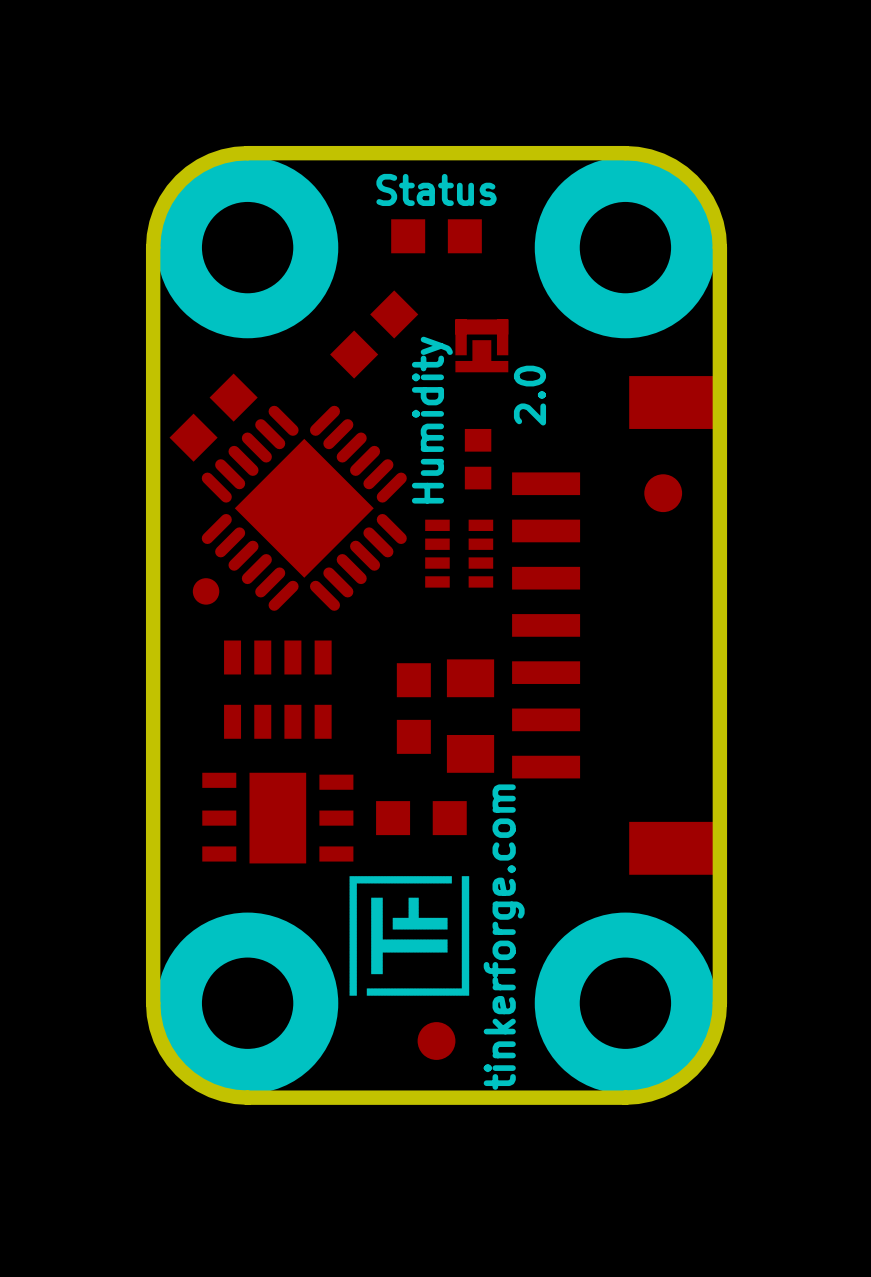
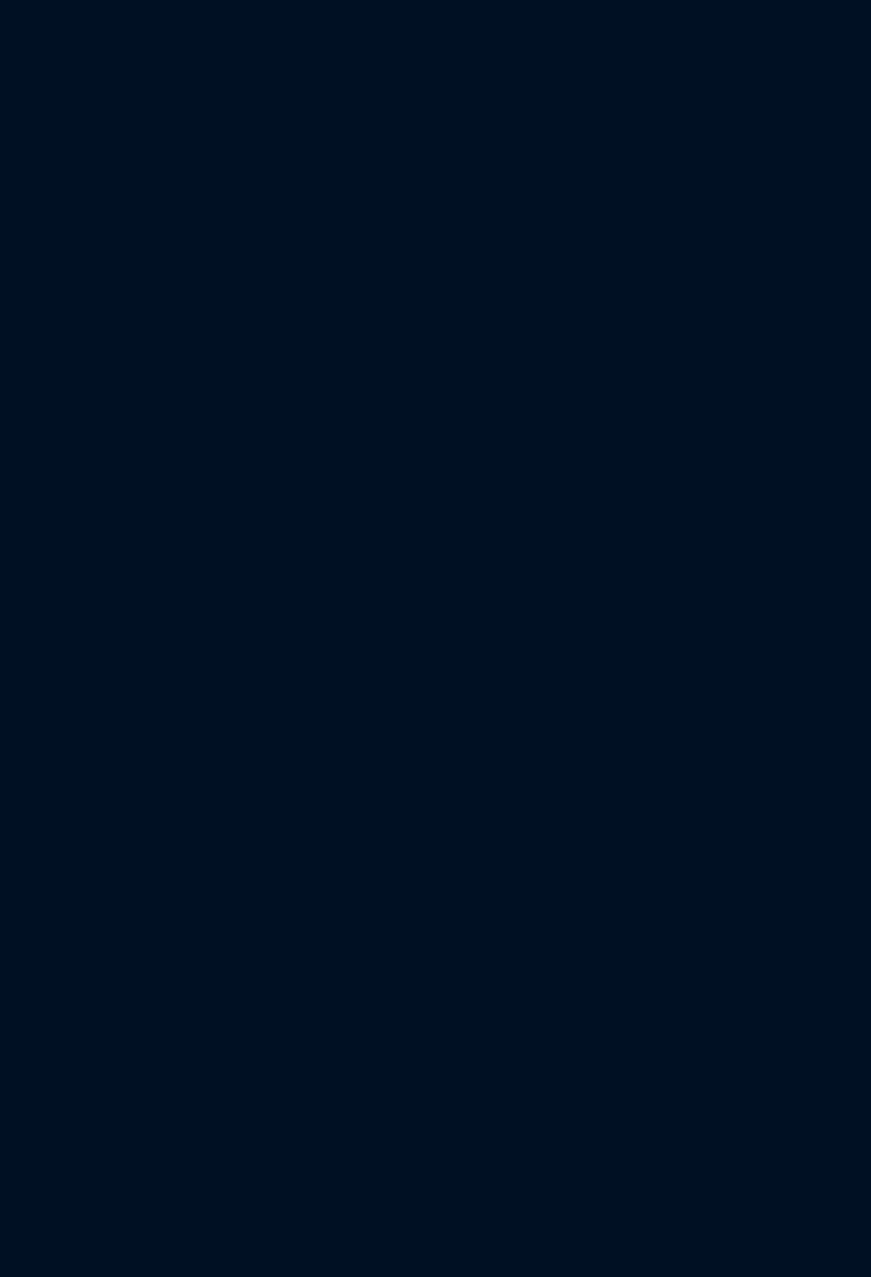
board edge: (247, 153) (637, 153) (661, 160) (682, 172) (700, 190) (712, 211) (719, 235) (719, 247) (719, 1003) (716, 1027) (707, 1050) (700, 1060) (682, 1078) (661, 1090) (637, 1096) (625, 1097) (235, 1096) (211, 1090) (190, 1078) (172, 1060) (160, 1039) (153, 1015) (153, 1003) (153, 235) (156, 223) (165, 200) (172, 190) (190, 172) (200, 165) (223, 156) (247, 153) -> none
text: Status (436, 189) -> none
part: (436, 236) -> none
part: (247, 247) -> none
part: (625, 247) -> none
part: (374, 334) -> none
part: (481, 345) -> none
text: 2.0 (529, 395) -> none
part: (213, 417) -> none
text: Humidity (432, 420) -> none
part: (478, 459) -> none
part: (663, 493) -> none
part: (304, 508) -> none
part: (459, 553) -> none
part: (206, 591) -> none
part: (615, 625) -> none
part: (277, 689) -> none
part: (413, 708) -> none
part: (470, 716) -> none
part: (277, 818) -> none
part: (421, 818) -> none
drawing: [349, 876, 470, 996] -> none
text: tinkerforge.com (504, 937) -> none
part: (247, 1003) -> none
part: (625, 1003) -> none
part: (436, 1041) -> none

